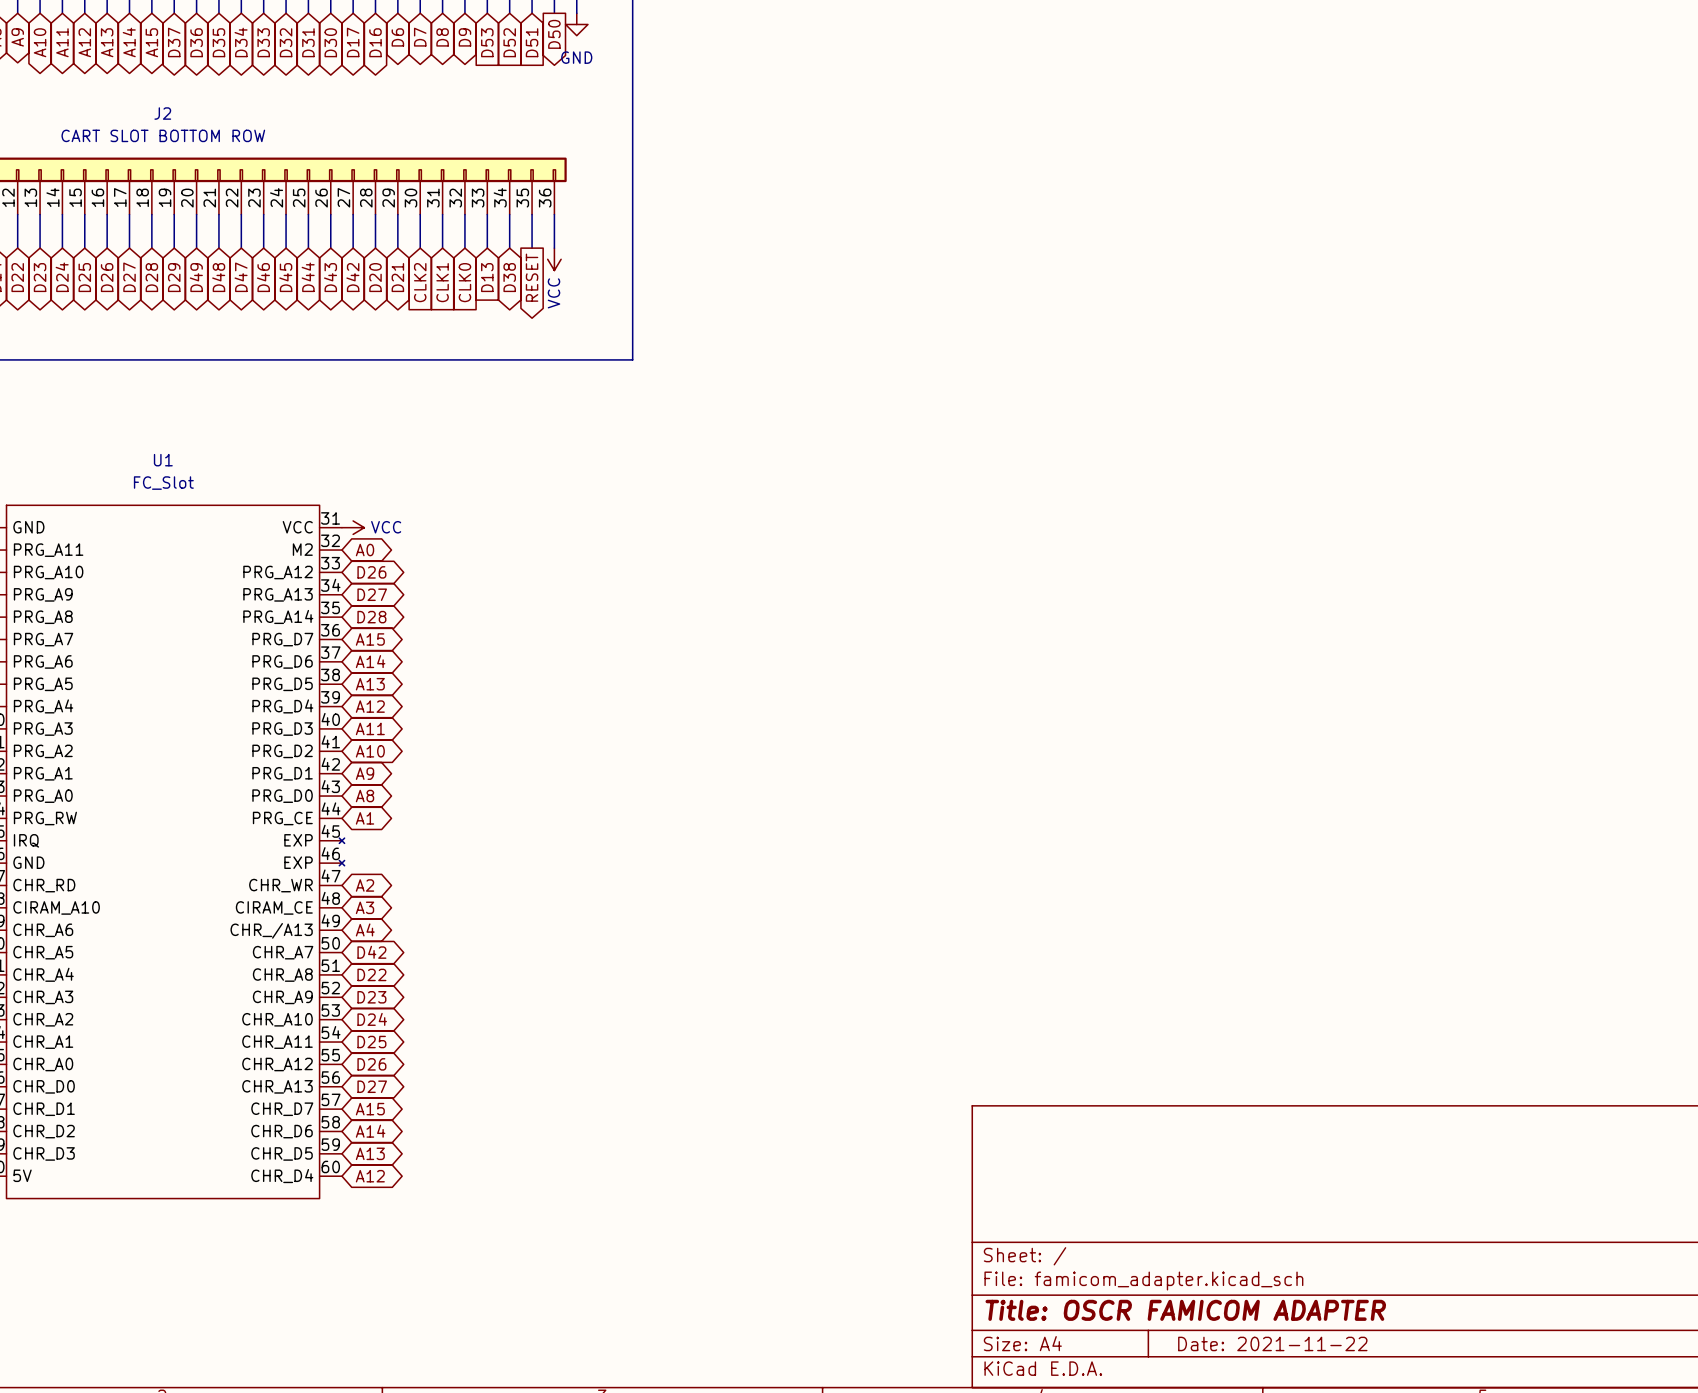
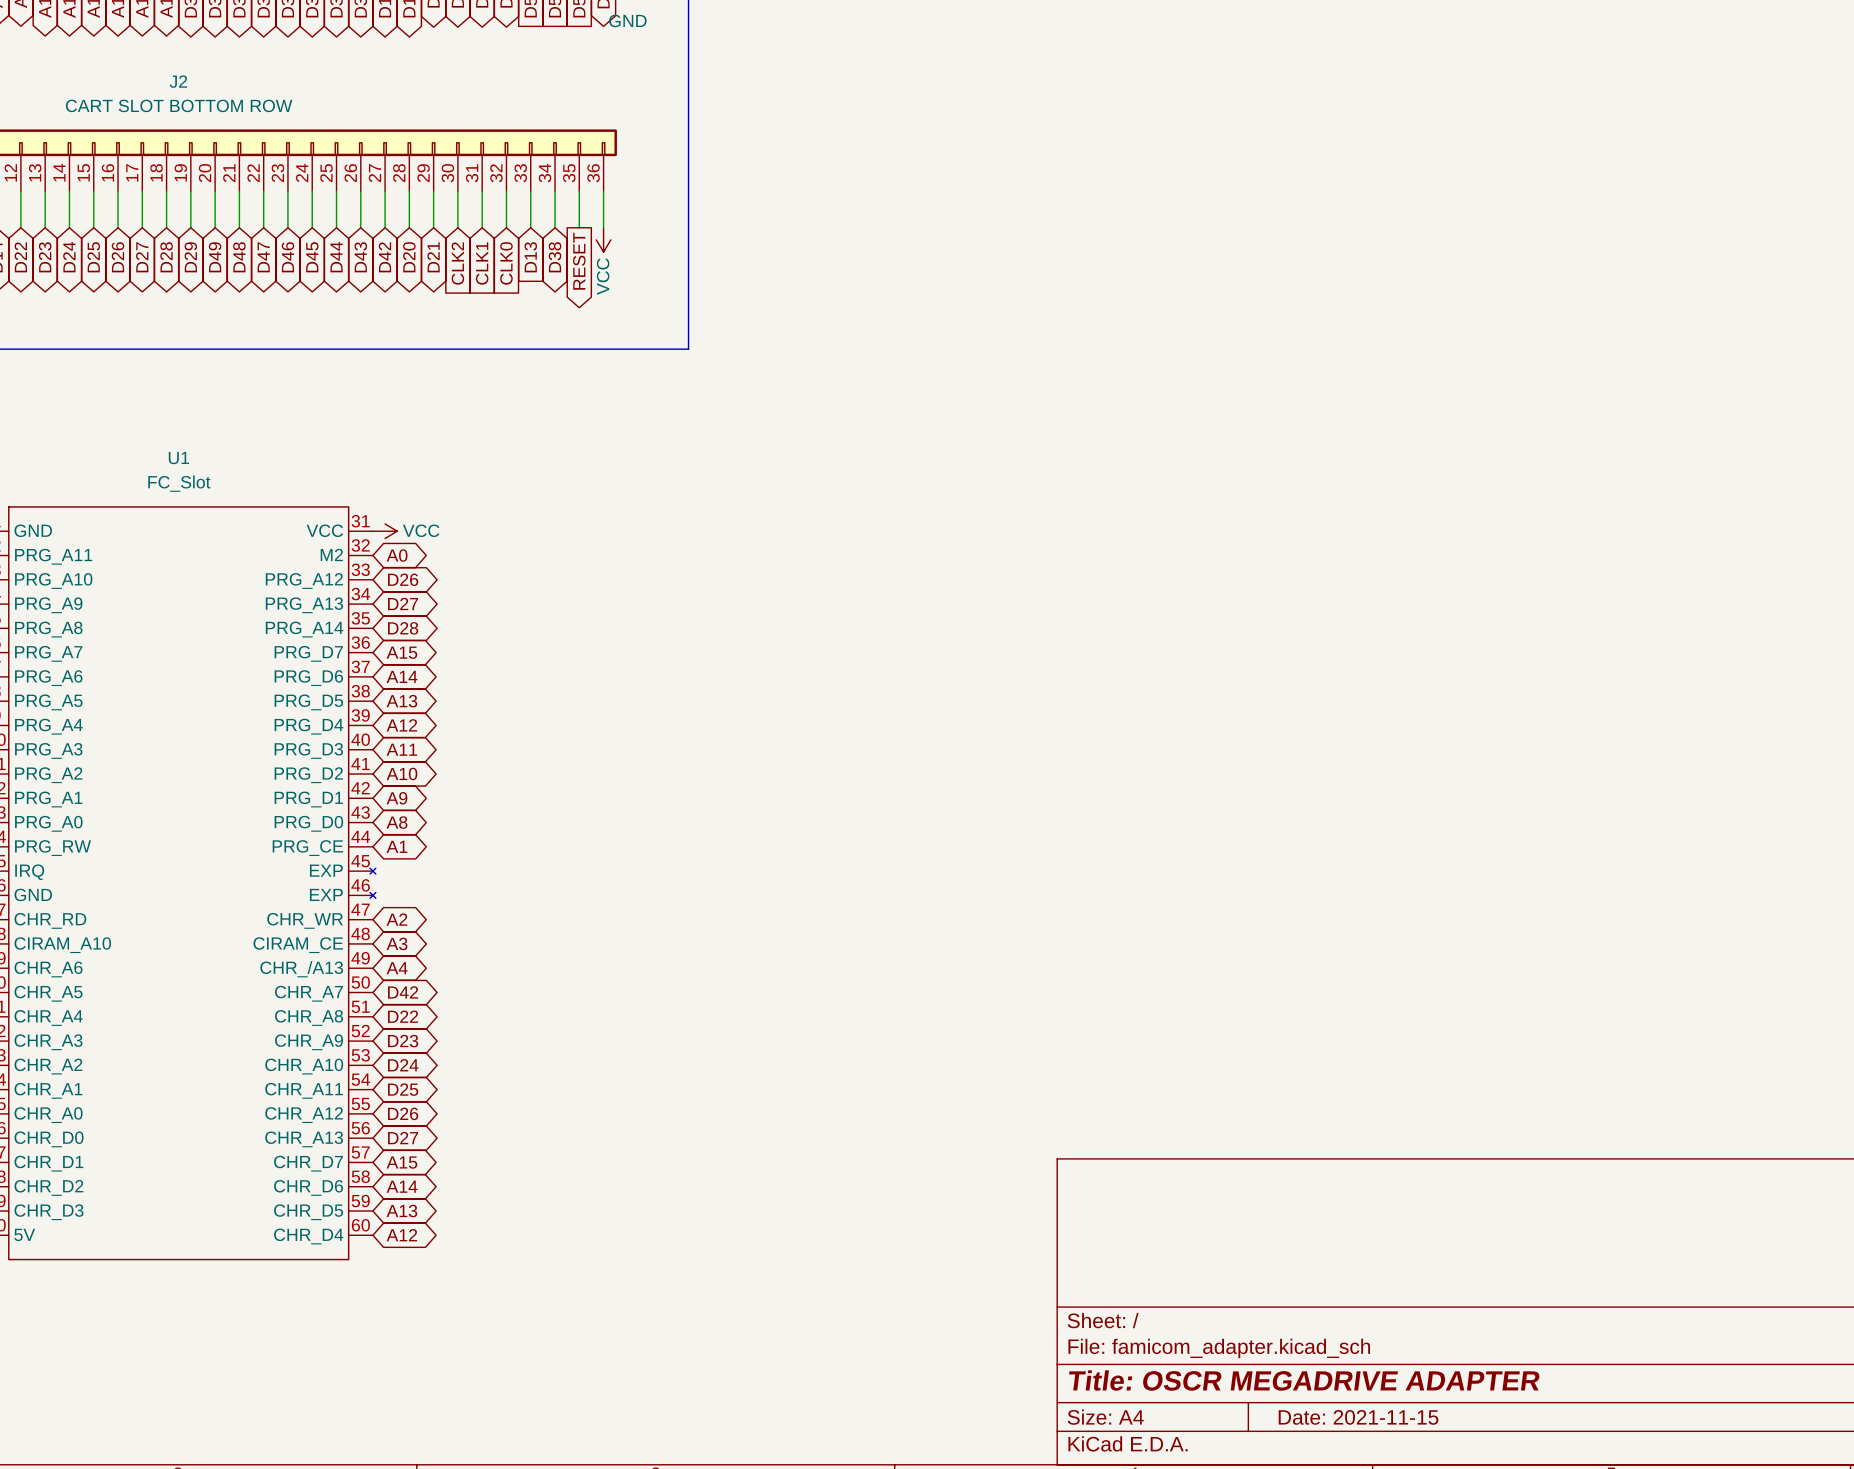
title block: Title: OSCR FAMICOM ADAPTER (1185, 1310) -> Title: OSCR MEGADRIVE ADAPTER (1304, 1380)
title block: Date: 2021-11-22 (1272, 1343) -> Date: 2021-11-15 (1358, 1417)

